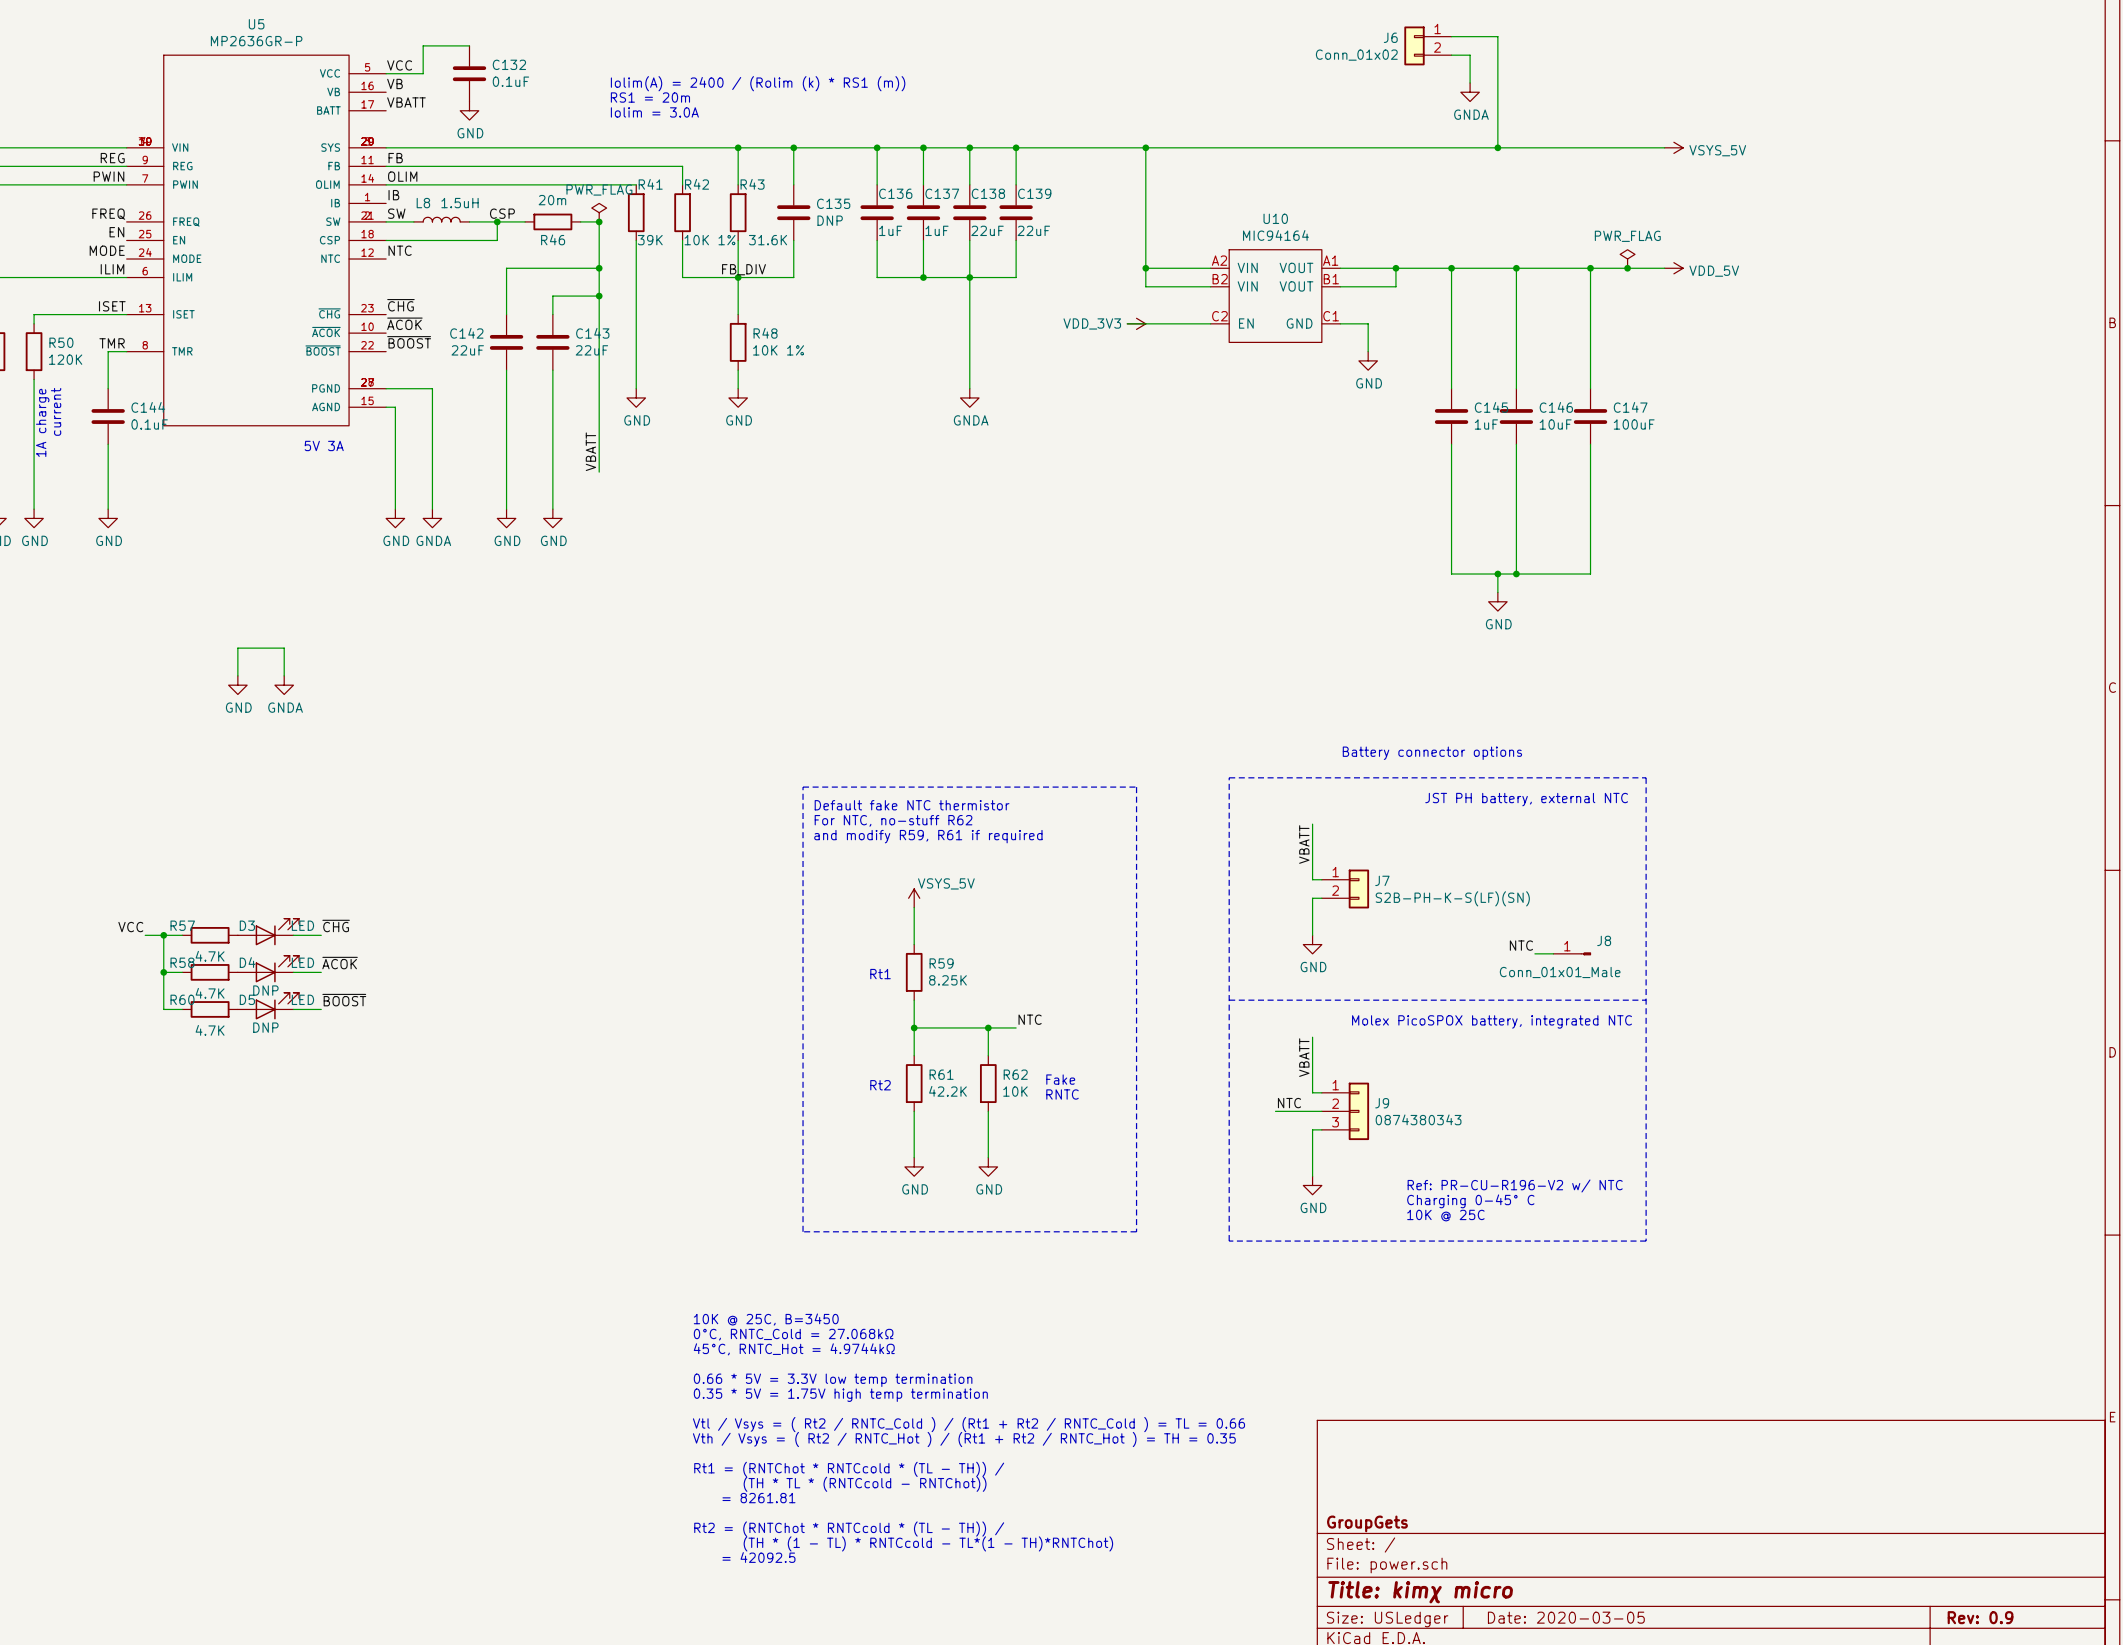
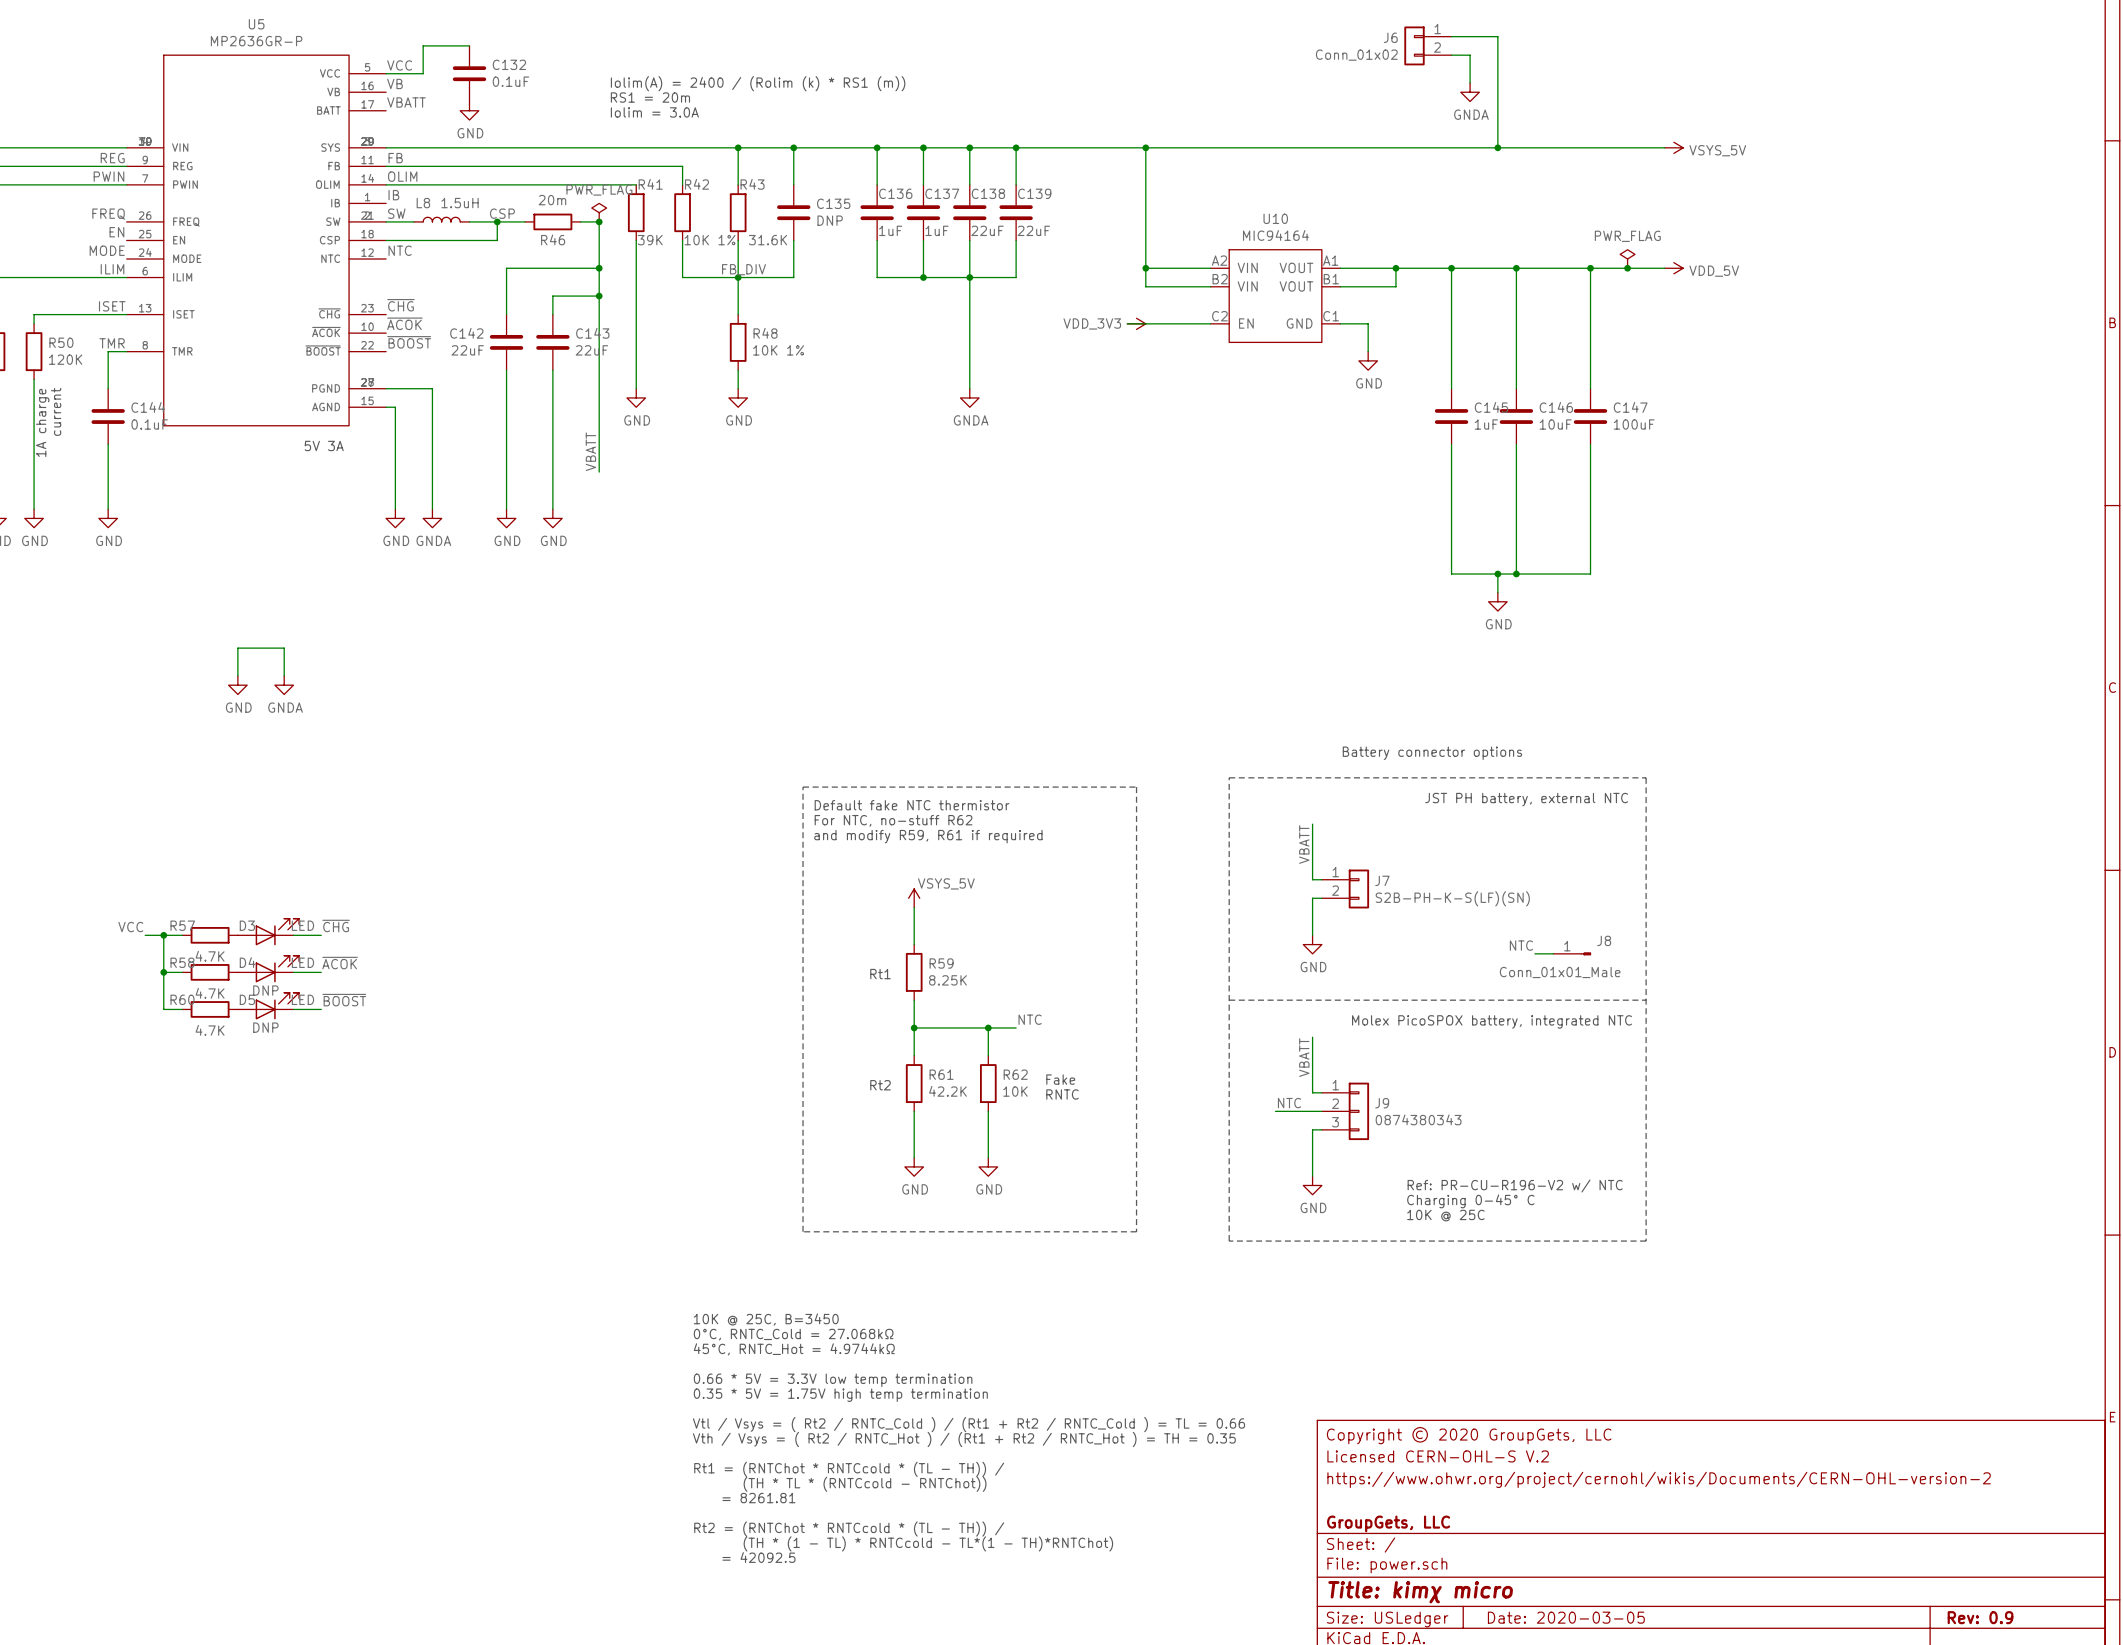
title block: none -> Copyright © 2020 GroupGets, LLC (1469, 1435)
title block: none -> Licensed CERN-OHL-S V.2 (1438, 1456)
title block: none -> https://www.ohwr.org/project/cernohl/wikis/Documents/CERN-OHL-version-2 (1659, 1479)
title block: GroupGets (1367, 1523) -> GroupGets, LLC (1388, 1523)

